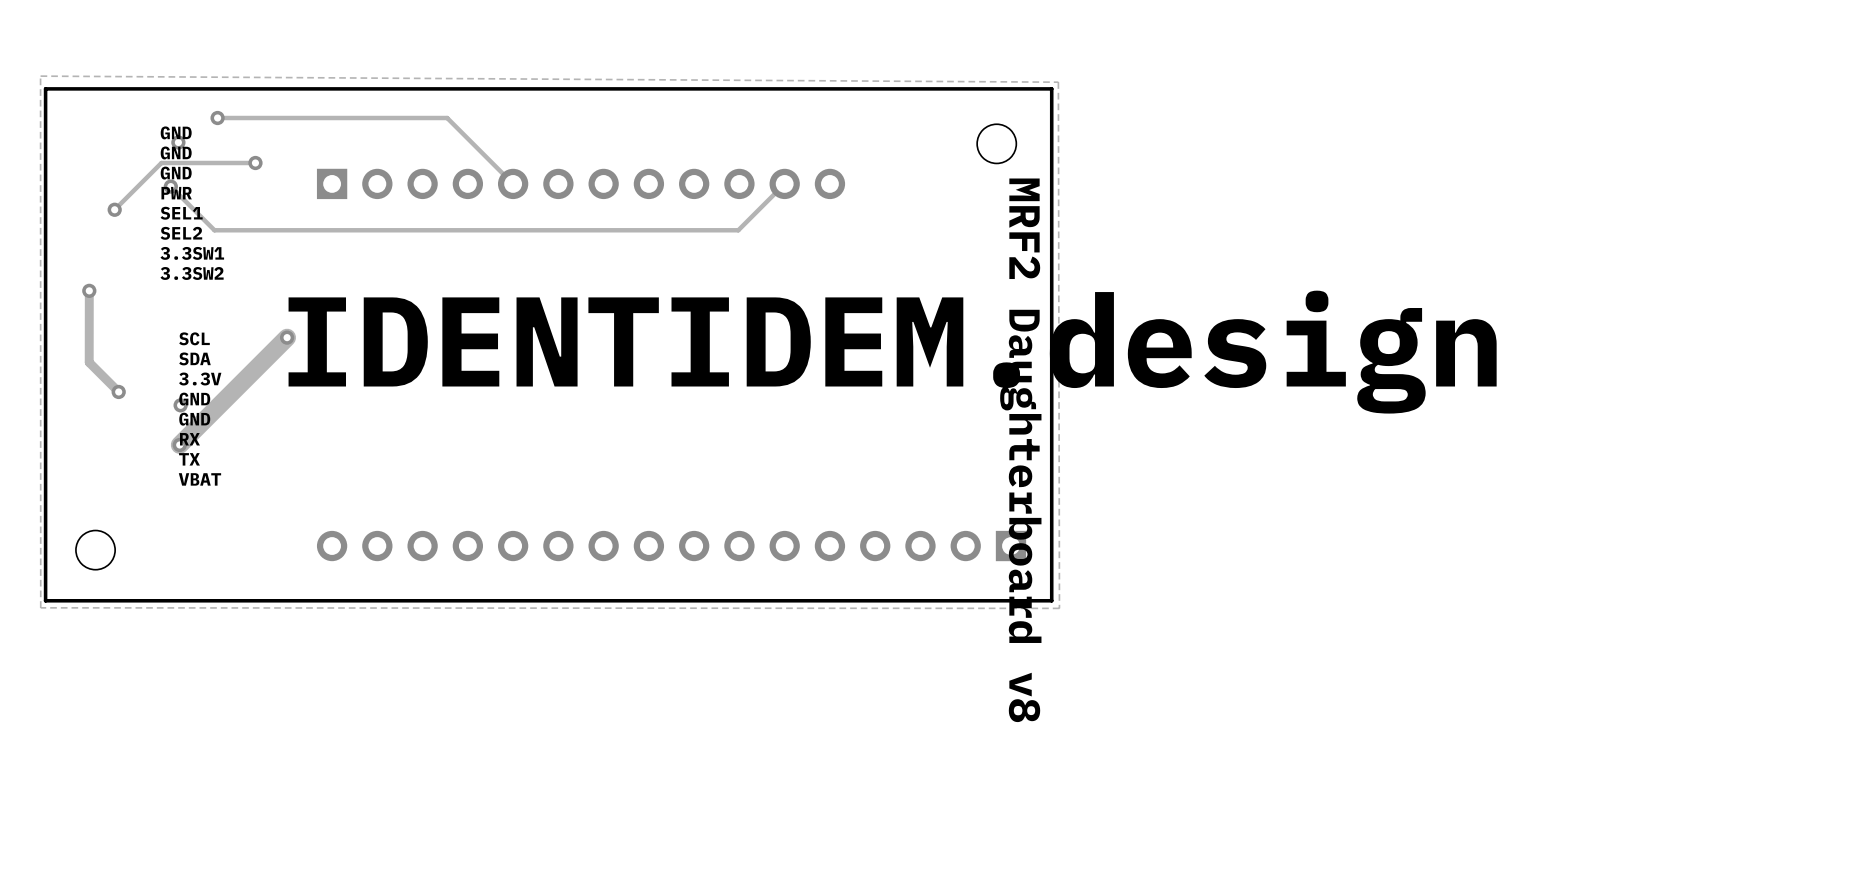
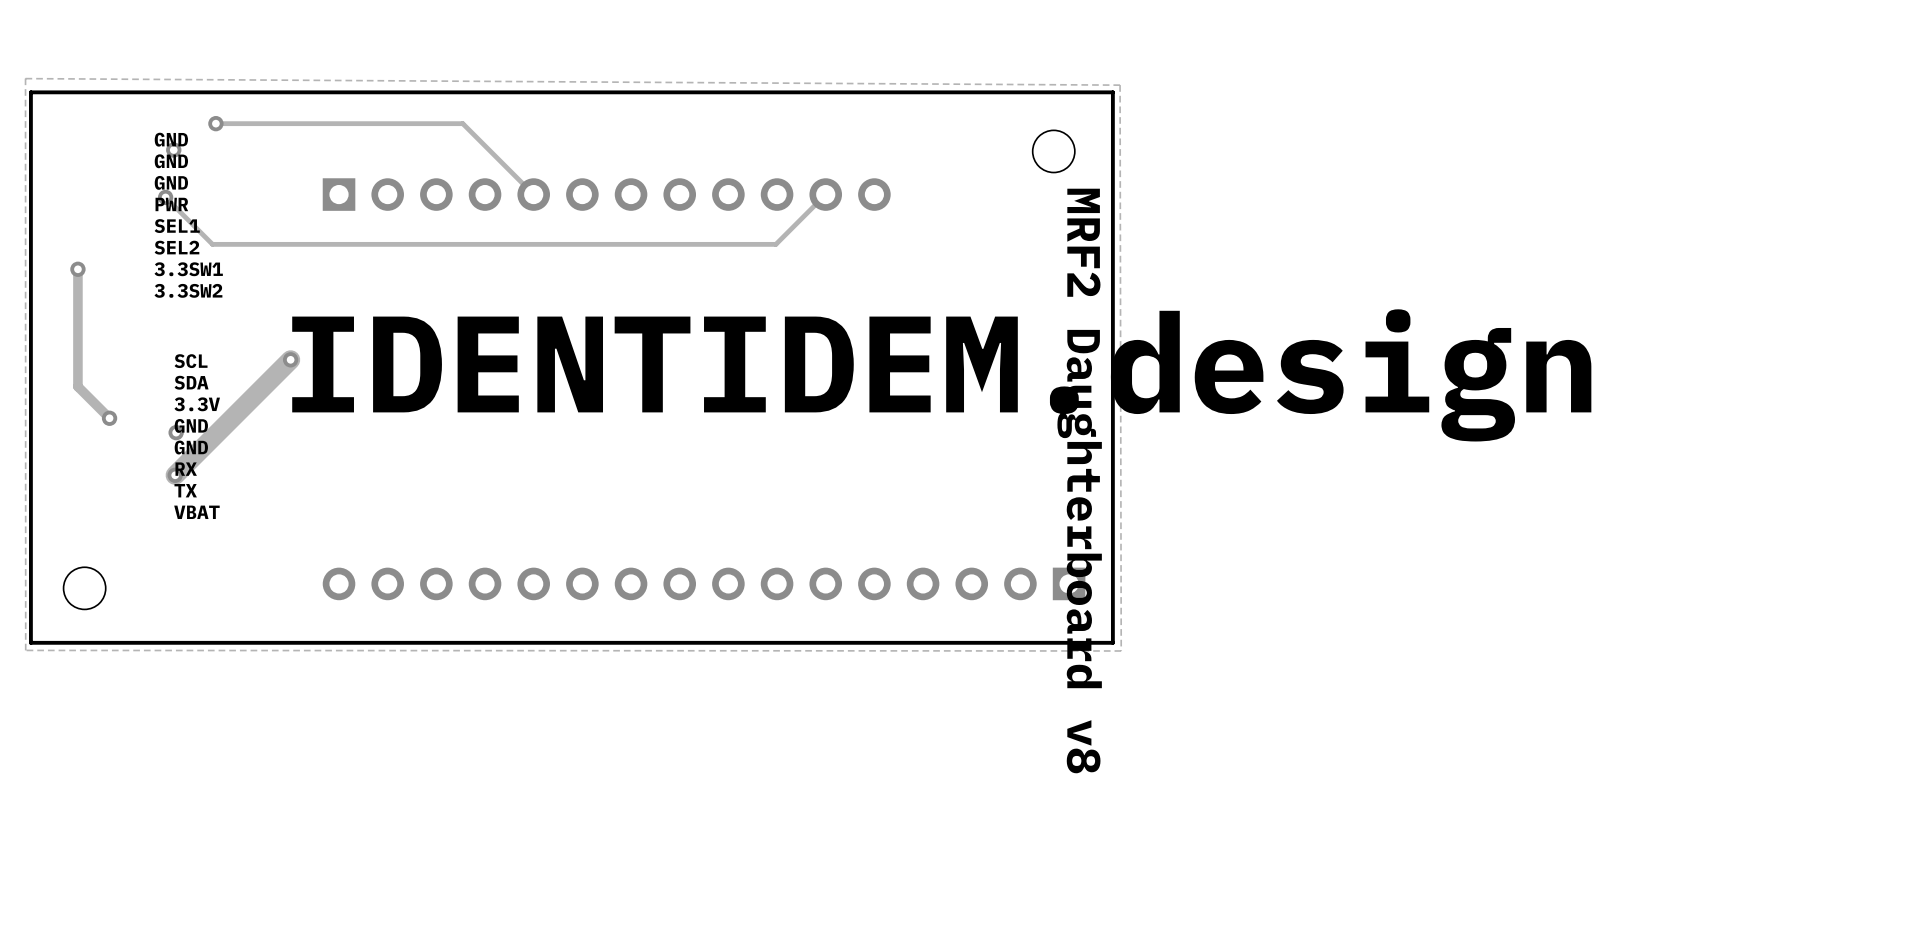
track: (255, 163) (161, 163) (114, 209) -> none
via: (255, 163) -> none
via: (114, 209) -> none
via: none -> (77, 269)
track: (89, 290) (89, 362) -> (77, 269) (77, 386)
via: (89, 290) -> none

